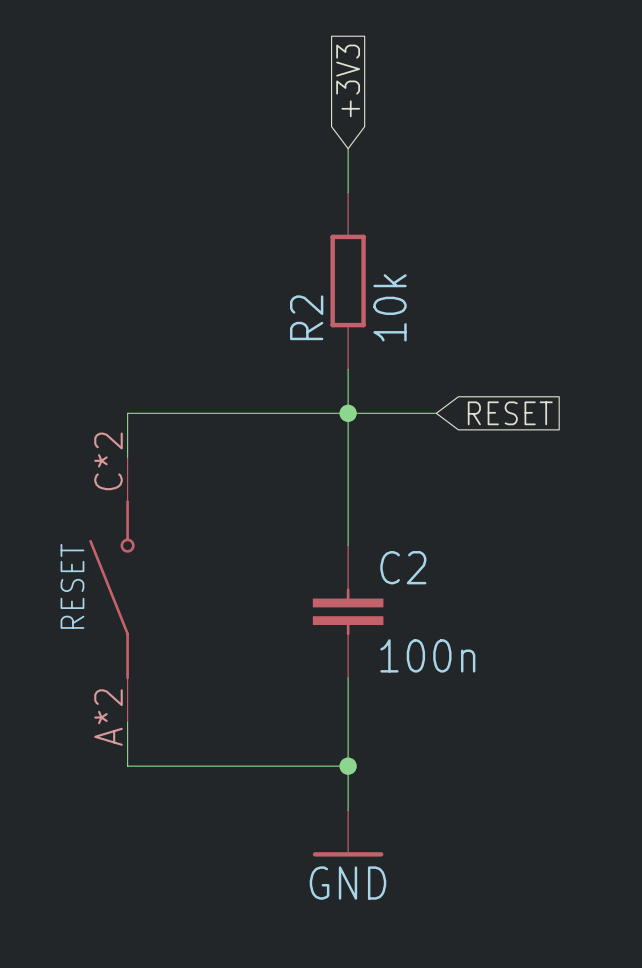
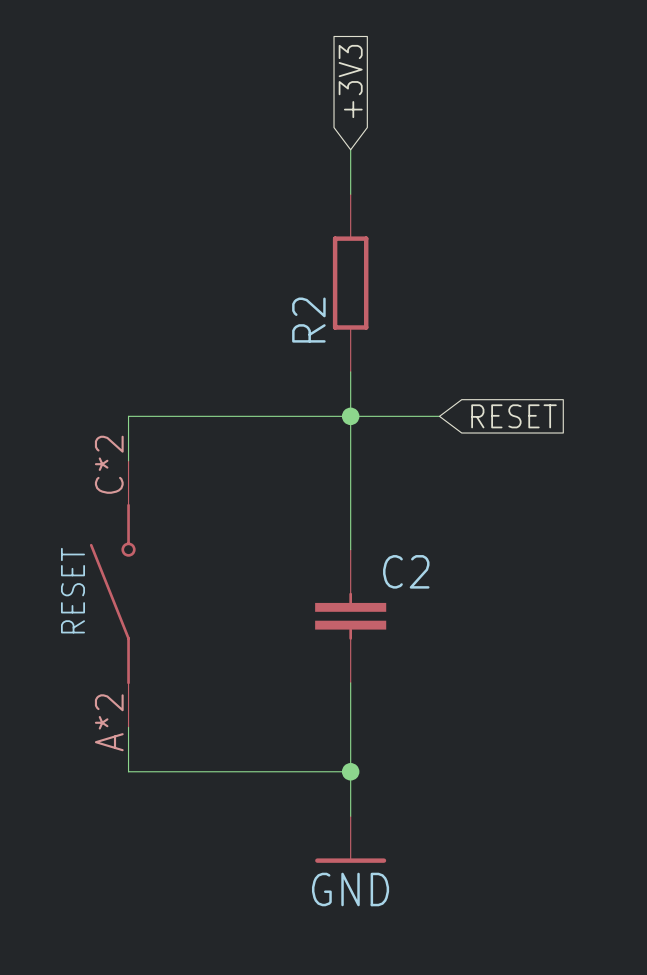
R2 value: 10k (390, 307) -> none
C2 value: 100n (427, 655) -> none

